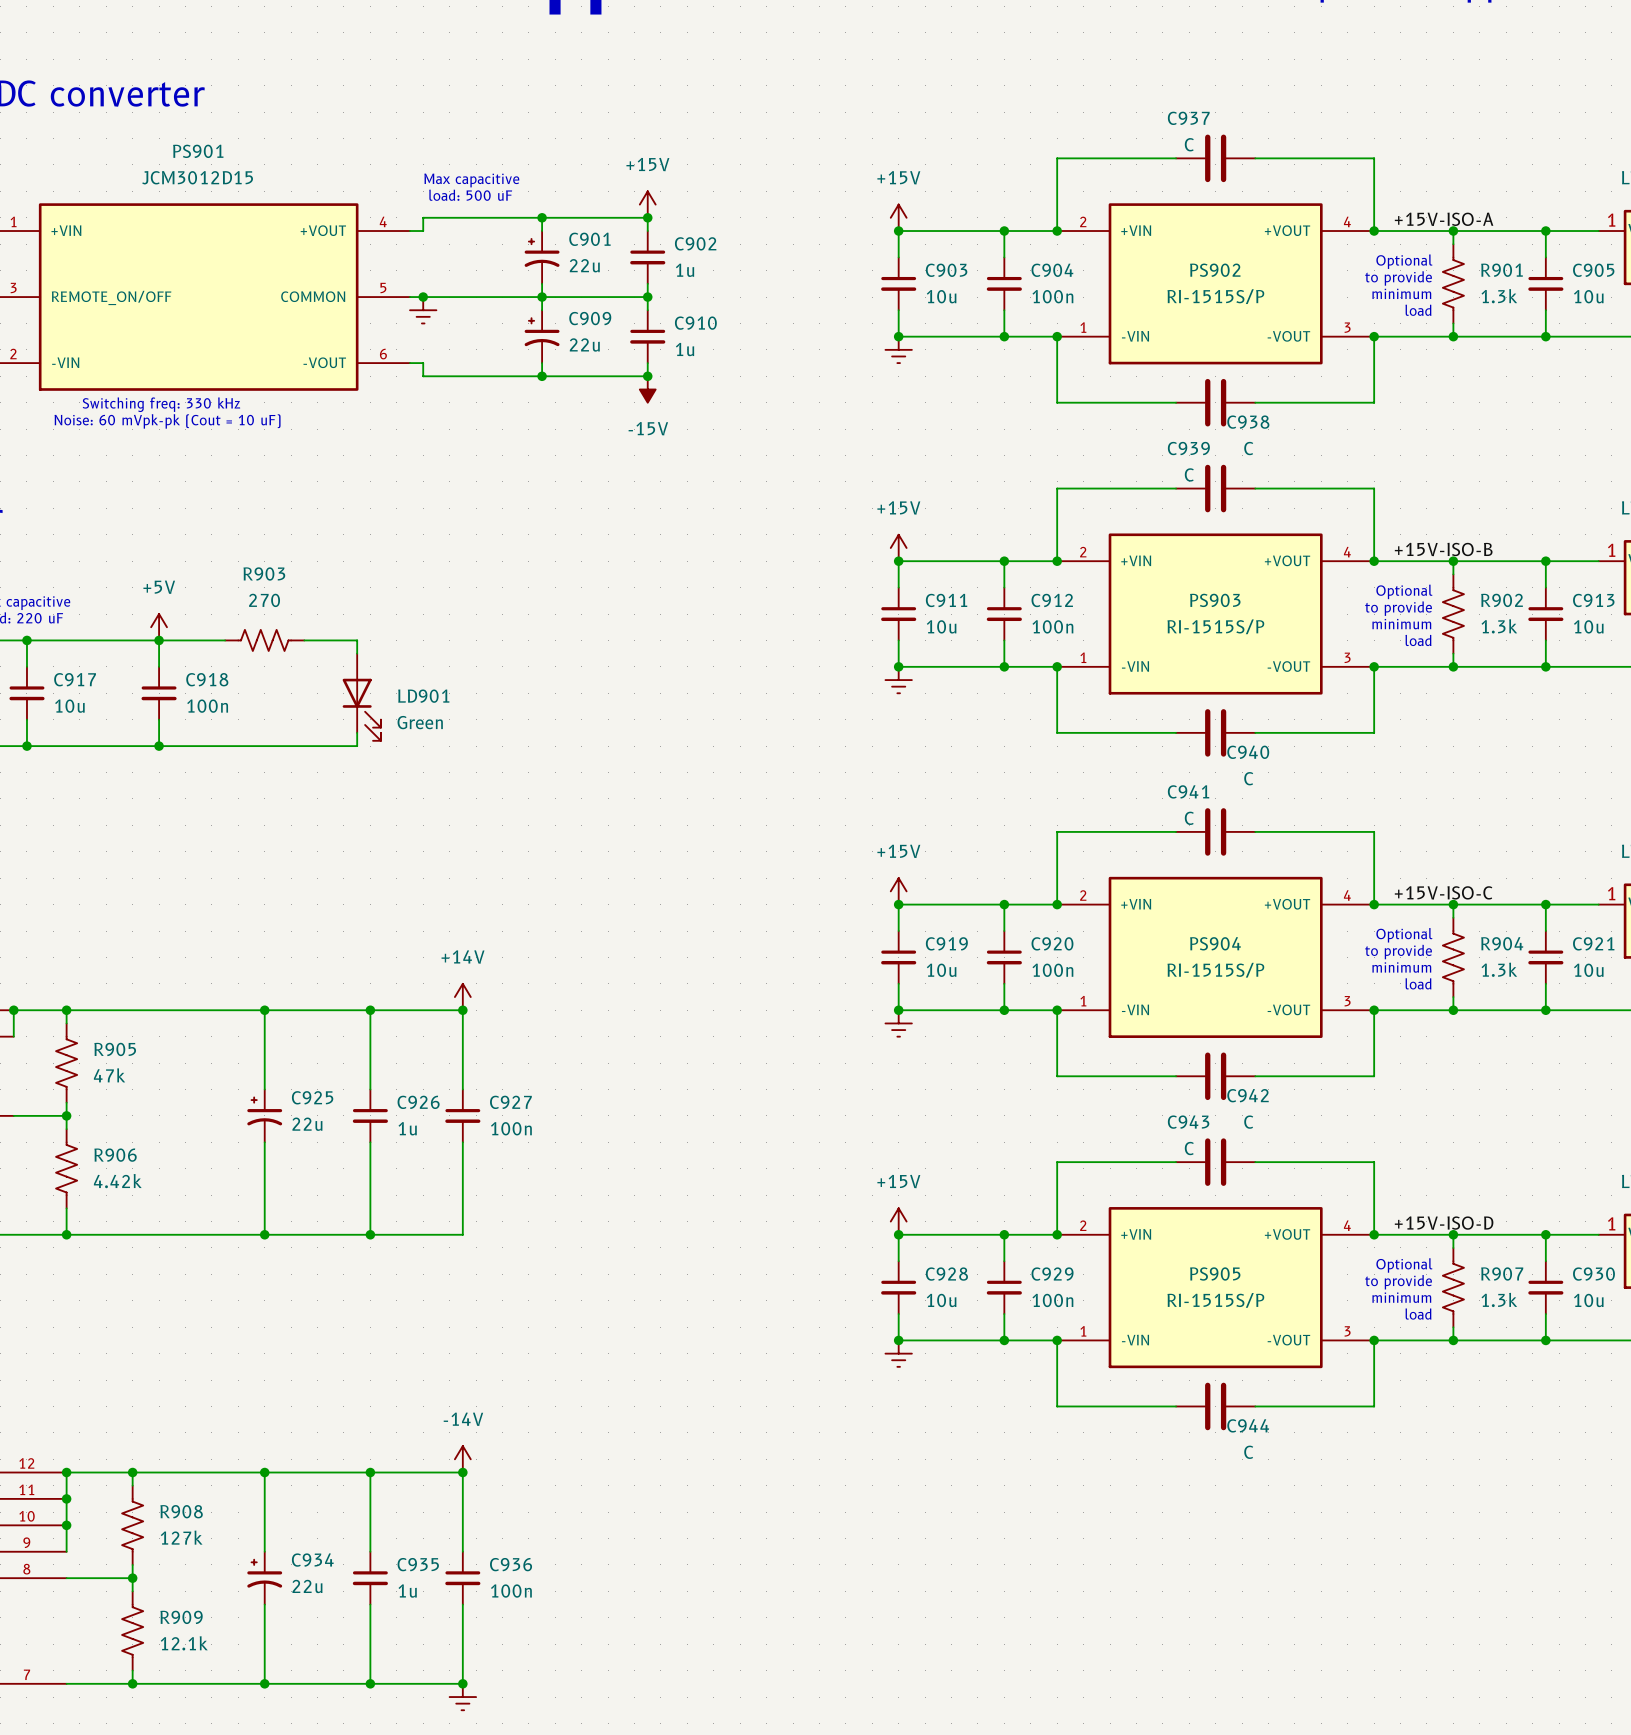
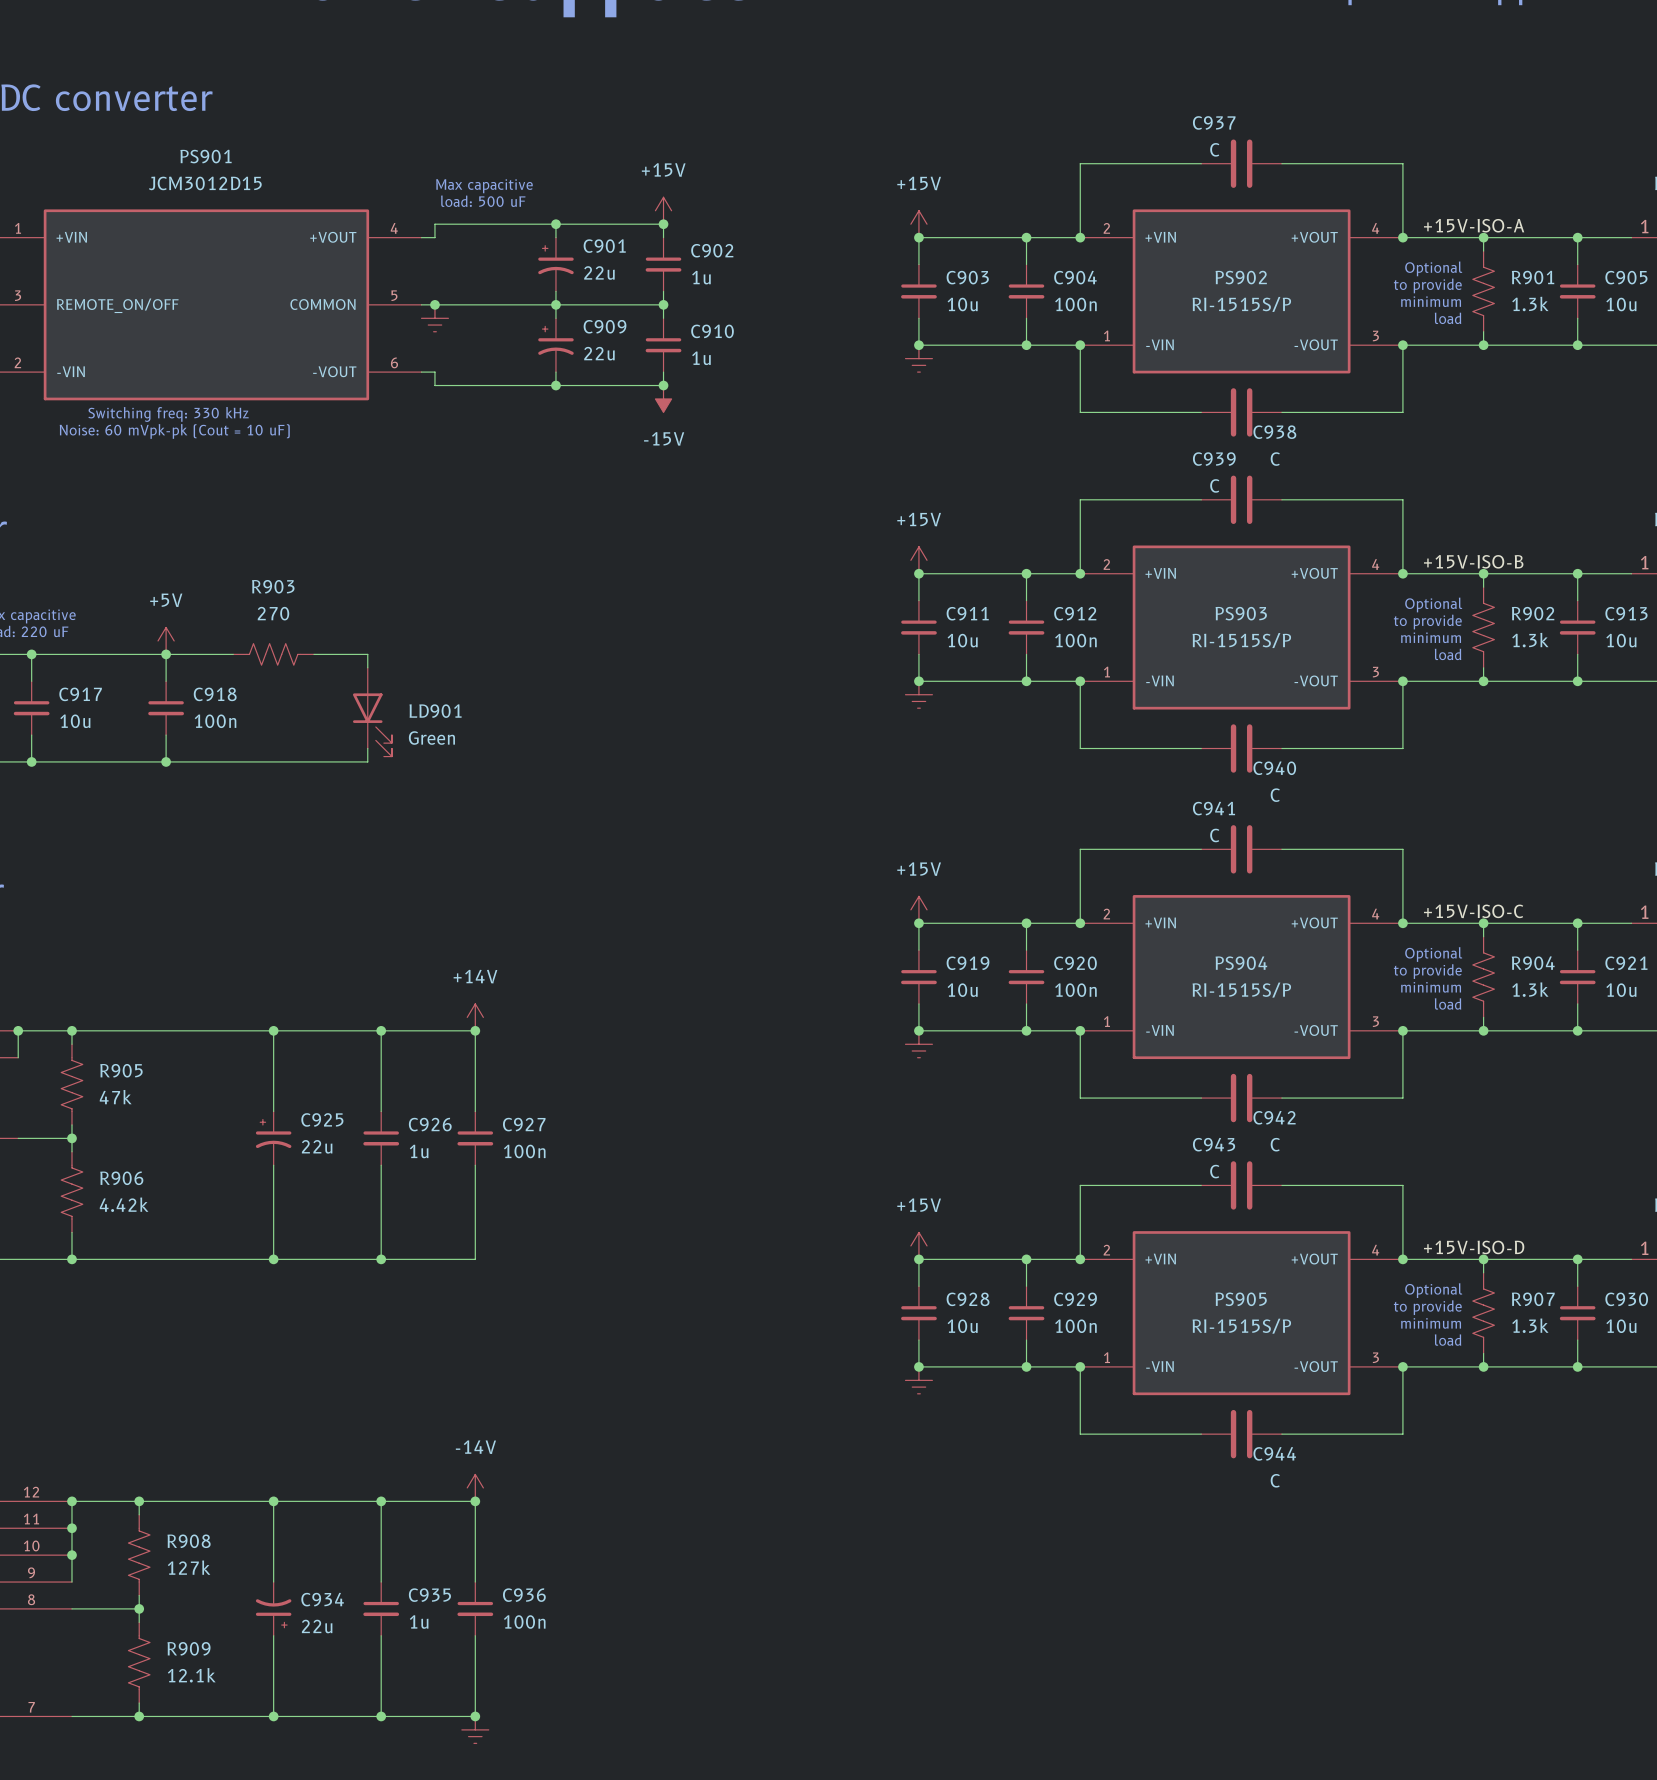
C934 rotation: 0° (264, 1573) -> 180° (273, 1613)

